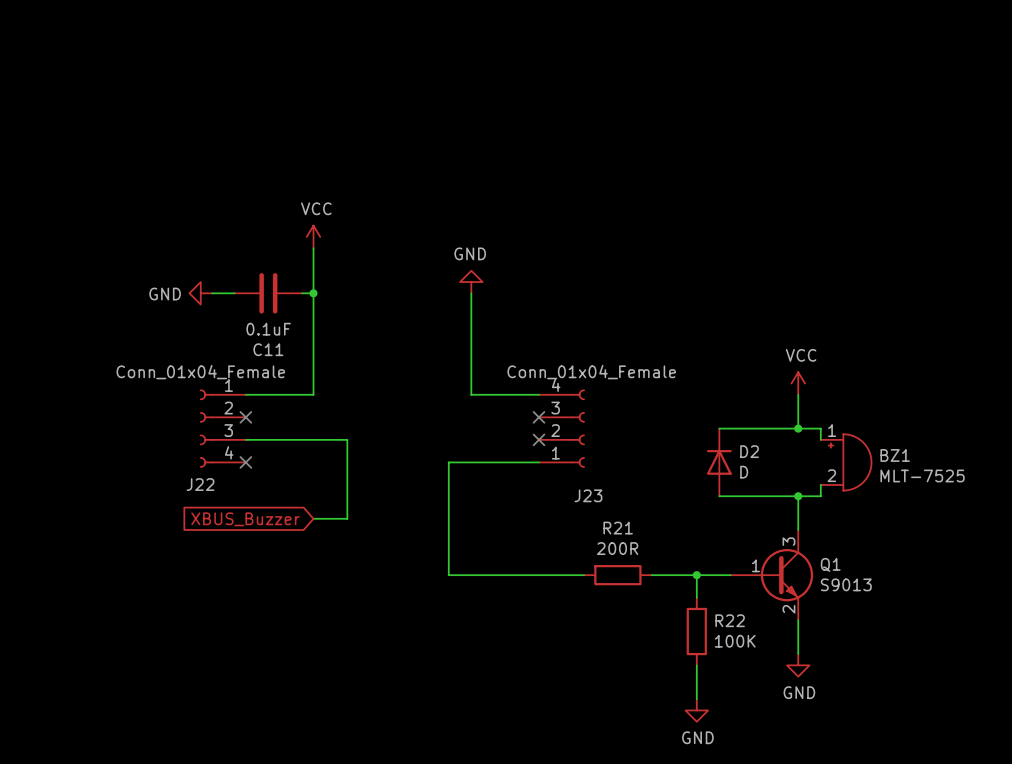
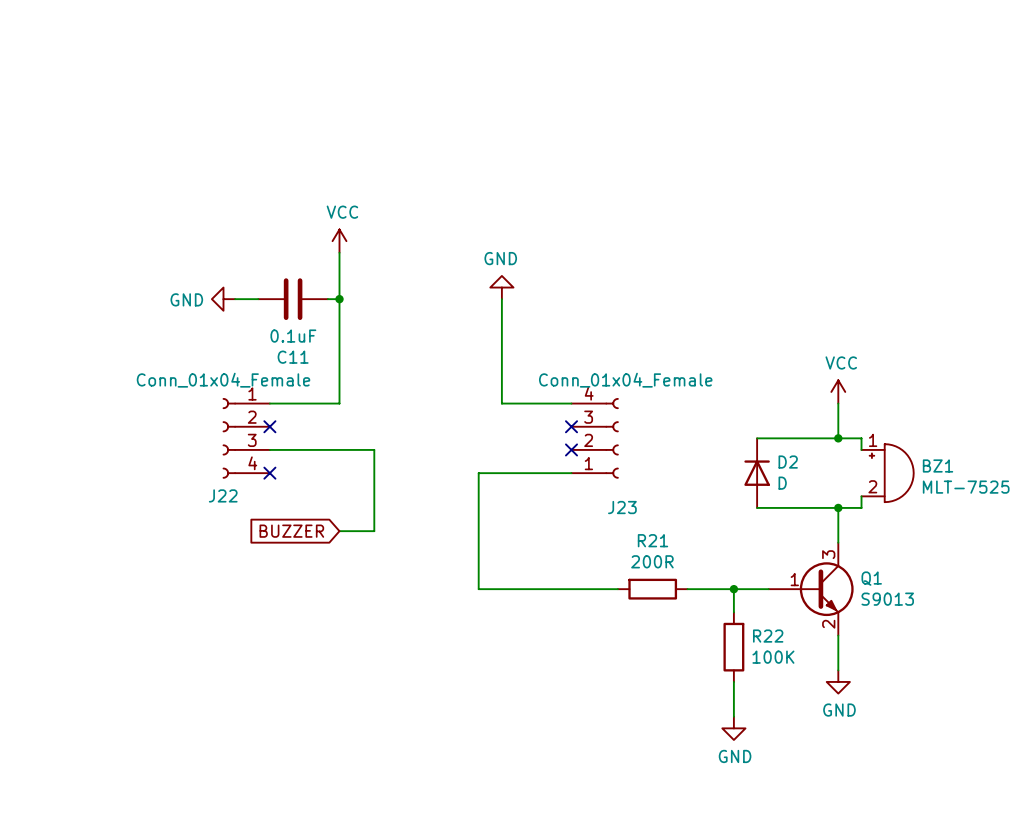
global label: XBUS_Buzzer (245, 519) -> BUZZER (291, 531)

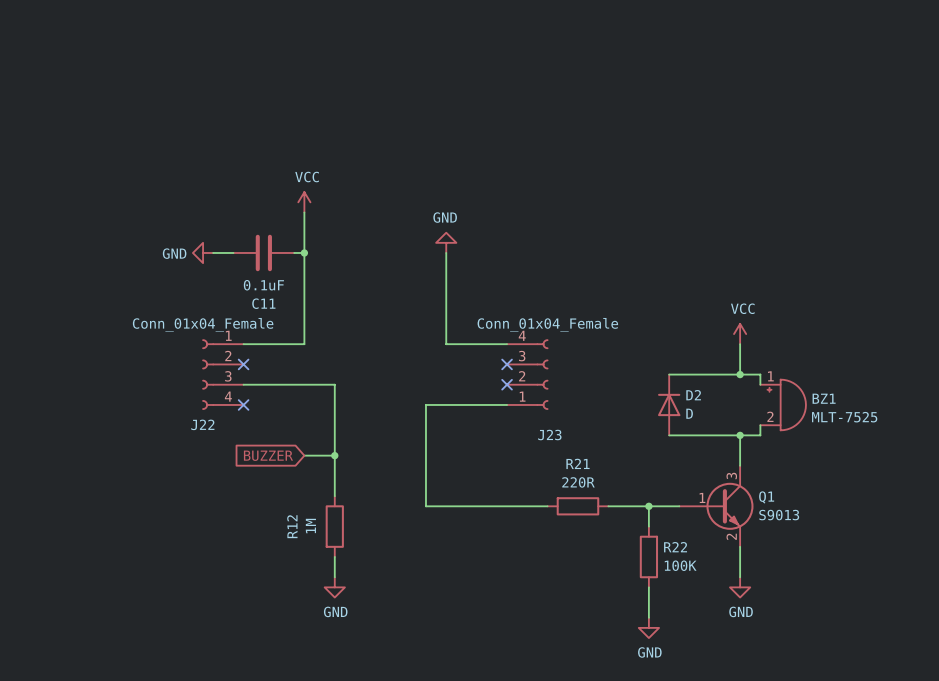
wire: none -> (334, 455) (334, 496)
junction: none -> (334, 455)
R21 value: 200R (652, 561) -> 220R (578, 482)
R12: none -> 1M (334, 526)
wire: none -> (334, 556) (334, 577)
power symbol: none -> GND (334, 587)

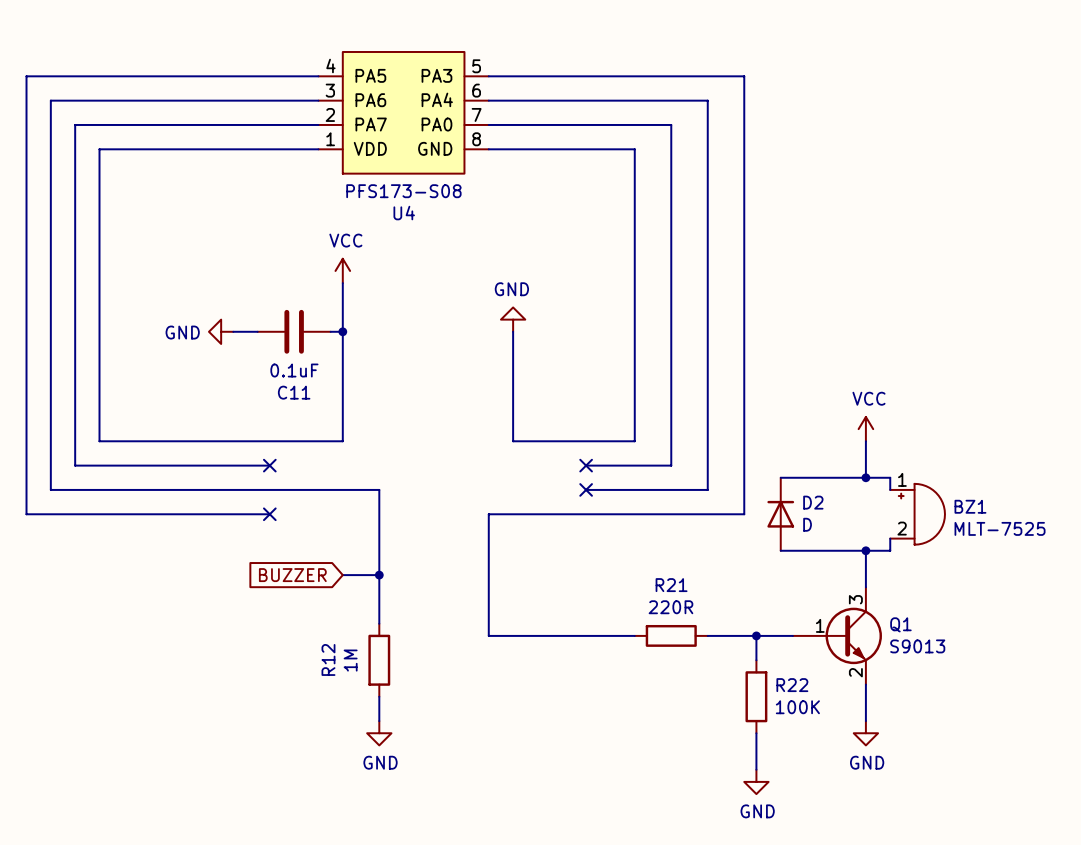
wire: none -> (318, 76) (26, 76) (26, 514) (269, 514)
wire: none -> (488, 76) (744, 76) (744, 514) (586, 514)
wire: none -> (318, 100) (50, 100) (50, 489) (269, 489)
wire: none -> (488, 100) (707, 100) (707, 489) (586, 489)
U4: none -> PFS173-S08 (403, 112)
wire: none -> (318, 124) (75, 124) (75, 465) (269, 465)
wire: none -> (488, 124) (671, 124) (671, 465) (586, 465)
wire: none -> (318, 149) (99, 149) (99, 441) (269, 441)
wire: none -> (488, 149) (634, 149) (634, 441) (586, 441)
J22: Conn_01x04_Female (223, 374) -> none
J23: Conn_01x04_Female (527, 374) -> none

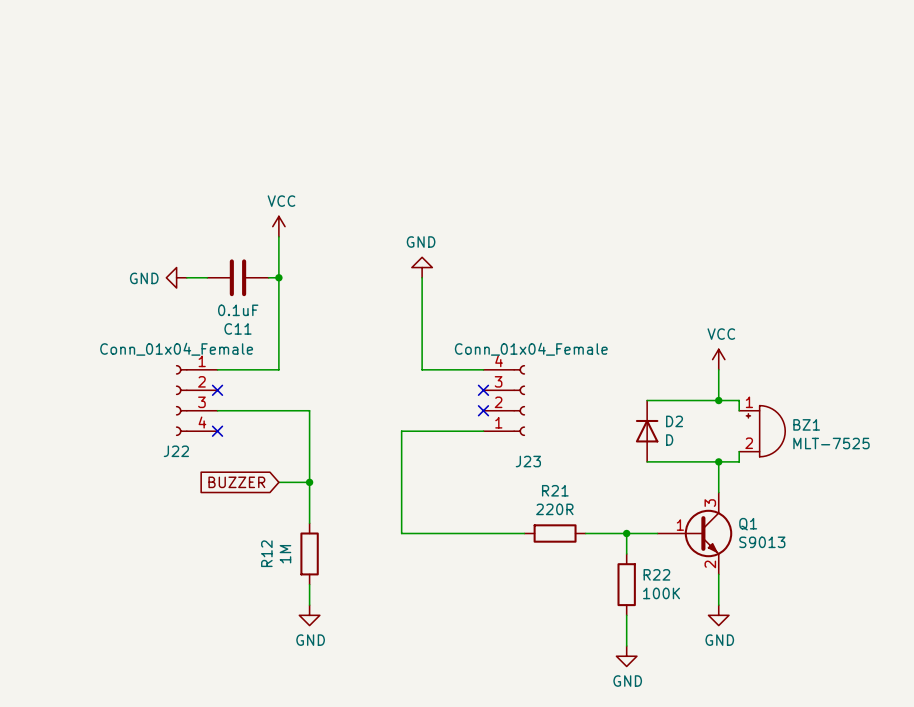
wire: (318, 76) (26, 76) (26, 514) (269, 514) -> none
wire: (488, 76) (744, 76) (744, 514) (586, 514) -> none
wire: (318, 100) (50, 100) (50, 489) (269, 489) -> none
wire: (488, 100) (707, 100) (707, 489) (586, 489) -> none
U4: PFS173-S08 (403, 112) -> none
wire: (318, 124) (75, 124) (75, 465) (269, 465) -> none
wire: (488, 124) (671, 124) (671, 465) (586, 465) -> none
wire: (318, 149) (99, 149) (99, 441) (269, 441) -> none
wire: (488, 149) (634, 149) (634, 441) (586, 441) -> none
J22: none -> Conn_01x04_Female (196, 400)
J23: none -> Conn_01x04_Female (504, 400)

